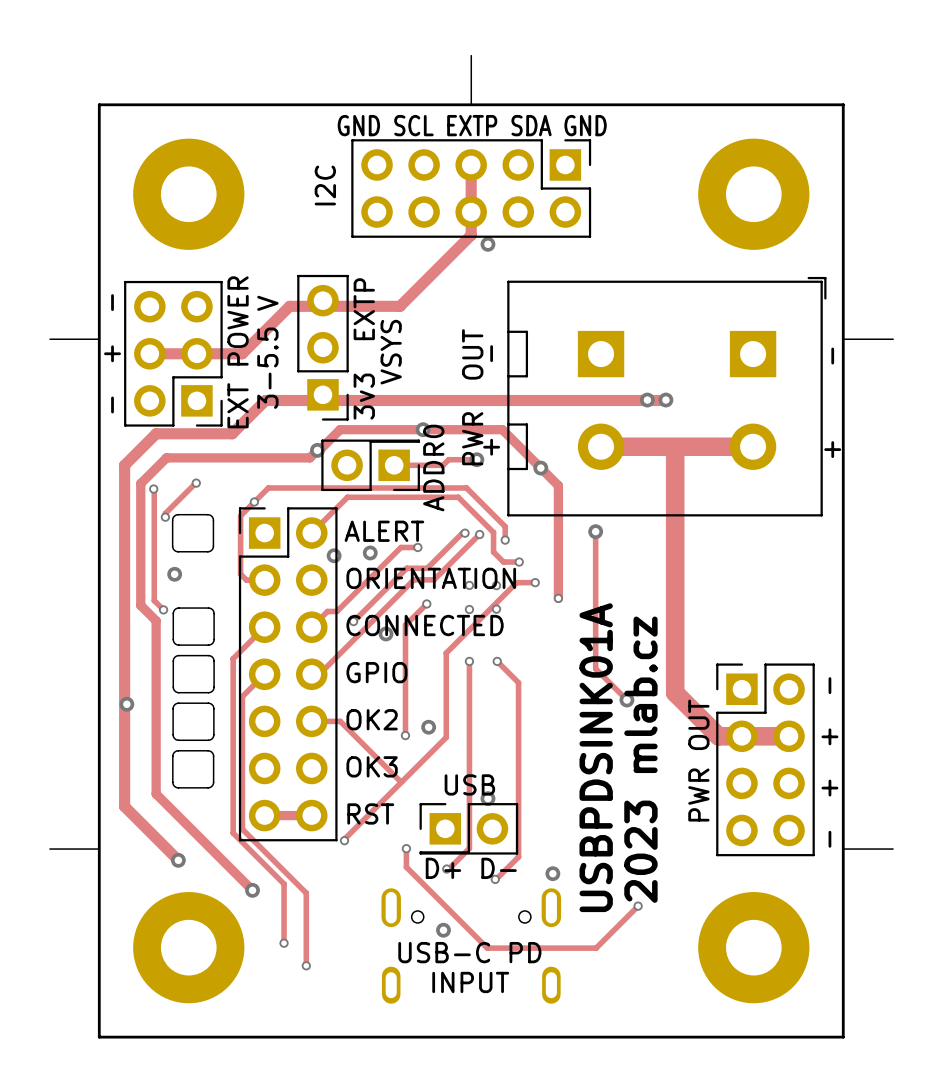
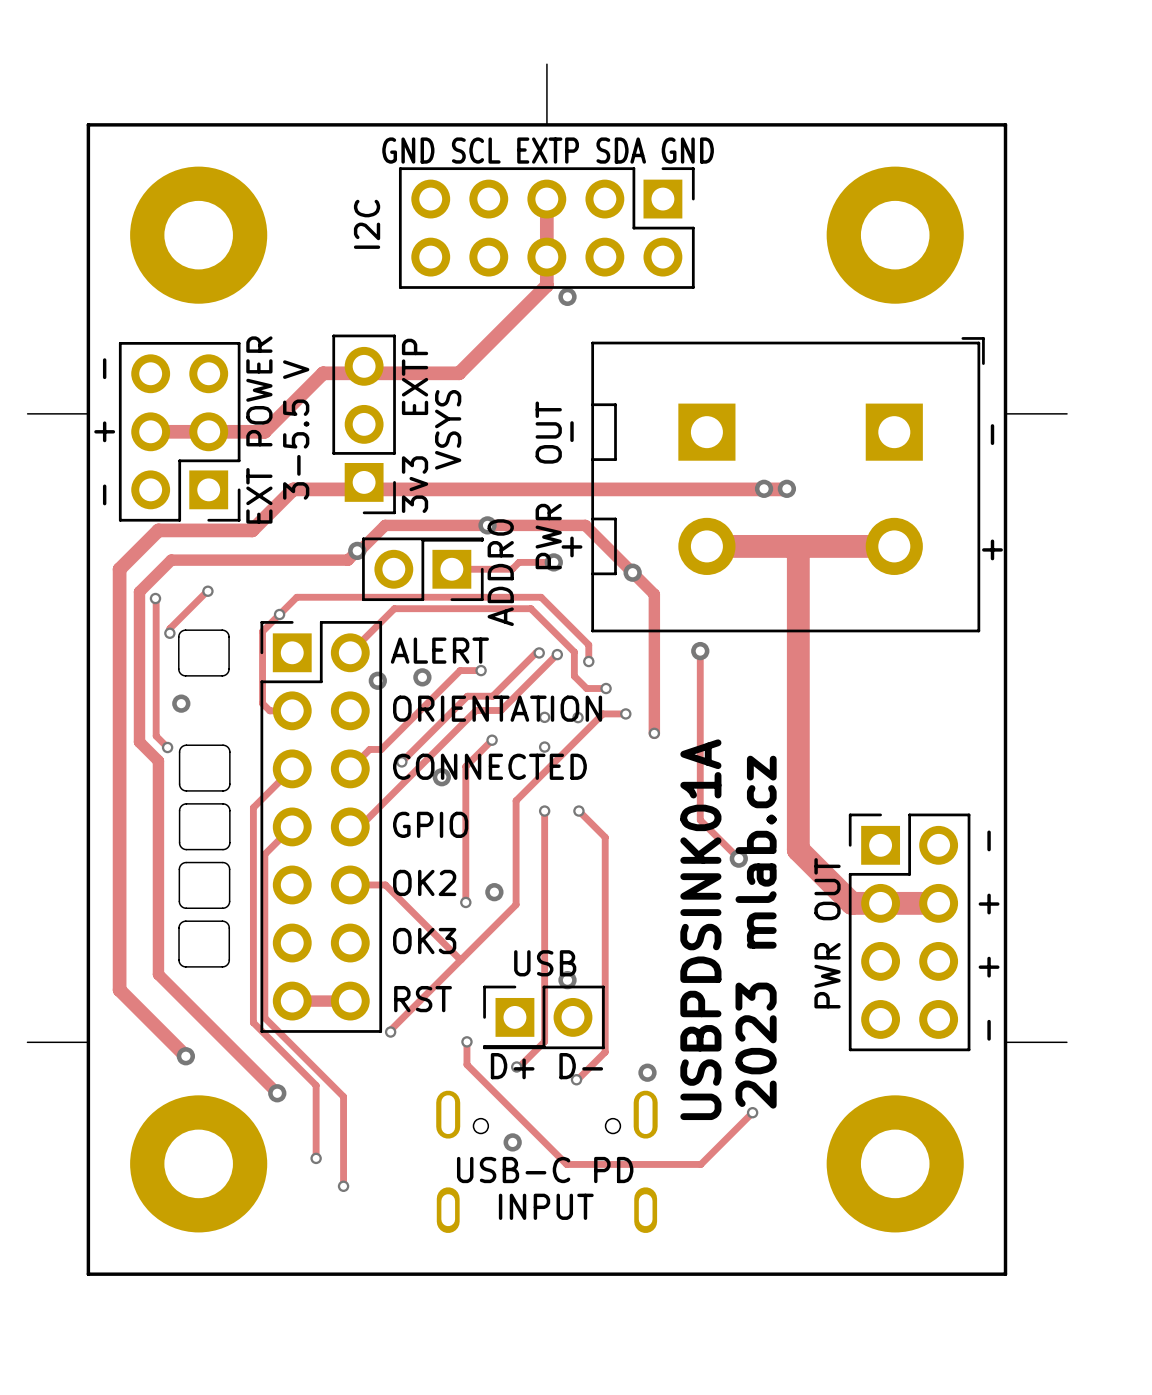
via: (496, 609) -> none
via: (126, 704) -> none

